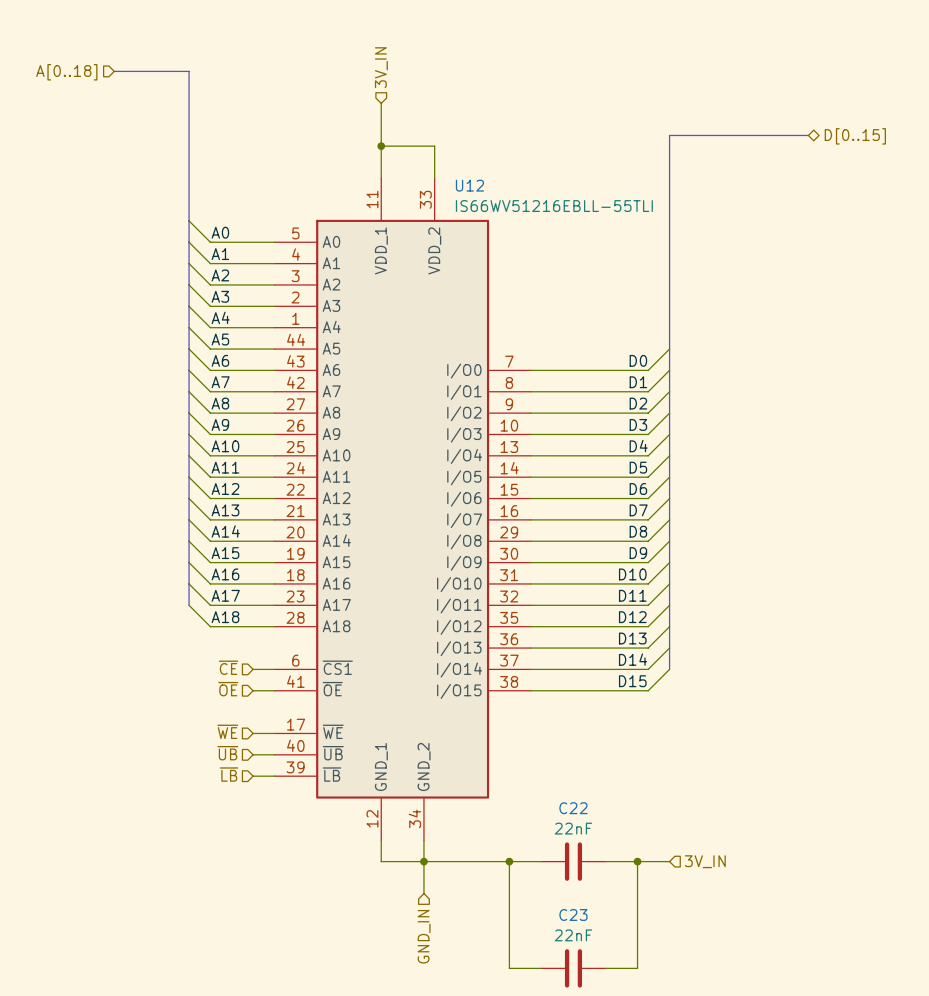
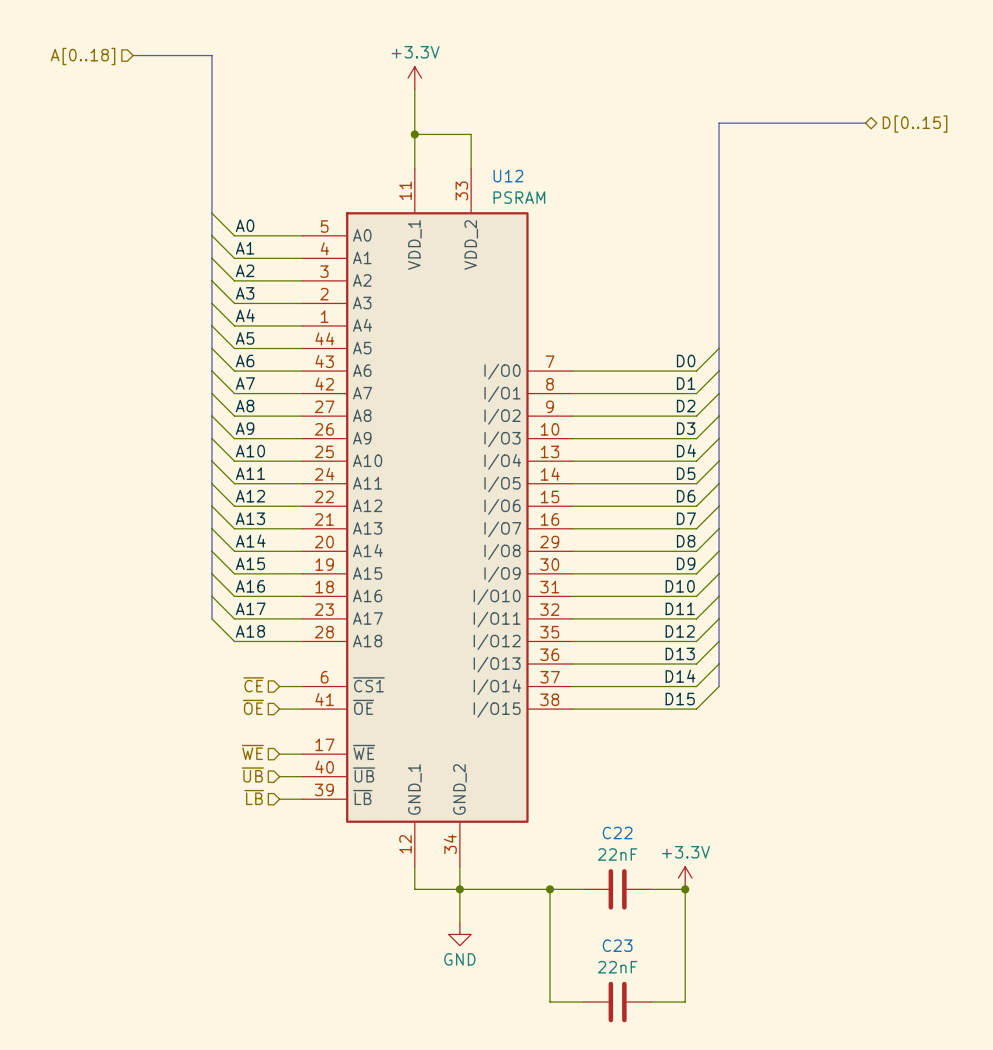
hierarchical label: 3V_IN (381, 67) -> none
power symbol: none -> +3.3V (414, 78)
U12 value: IS66WV51216EBLL-55TLI (554, 206) -> PSRAM (519, 197)
power symbol: none -> +3.3V (685, 878)
wire: (637, 861) (669, 861) -> none
hierarchical label: 3V_IN (705, 861) -> none
power symbol: none -> GND (459, 934)
hierarchical label: GND_IN (424, 936) -> none

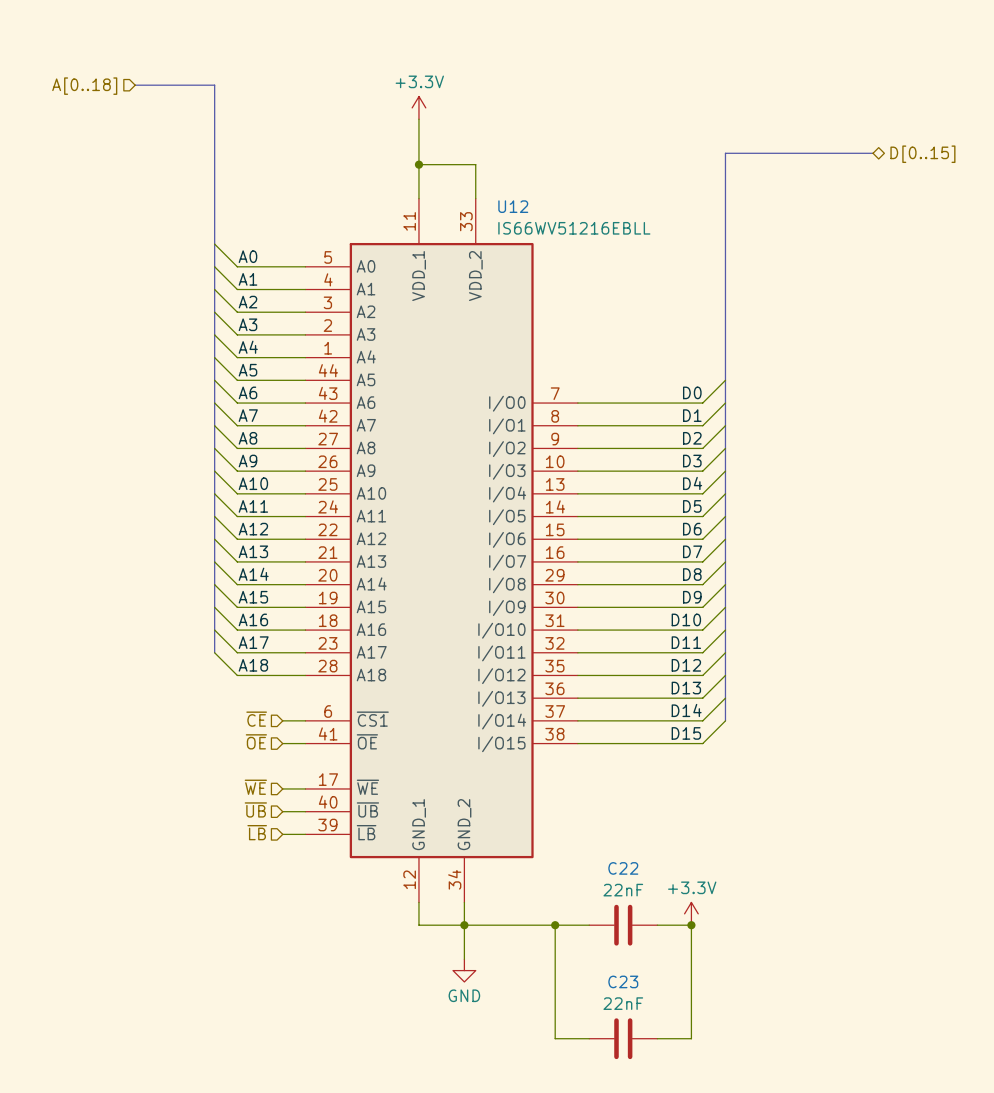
U12 value: PSRAM (519, 197) -> IS66WV51216EBLL (574, 228)

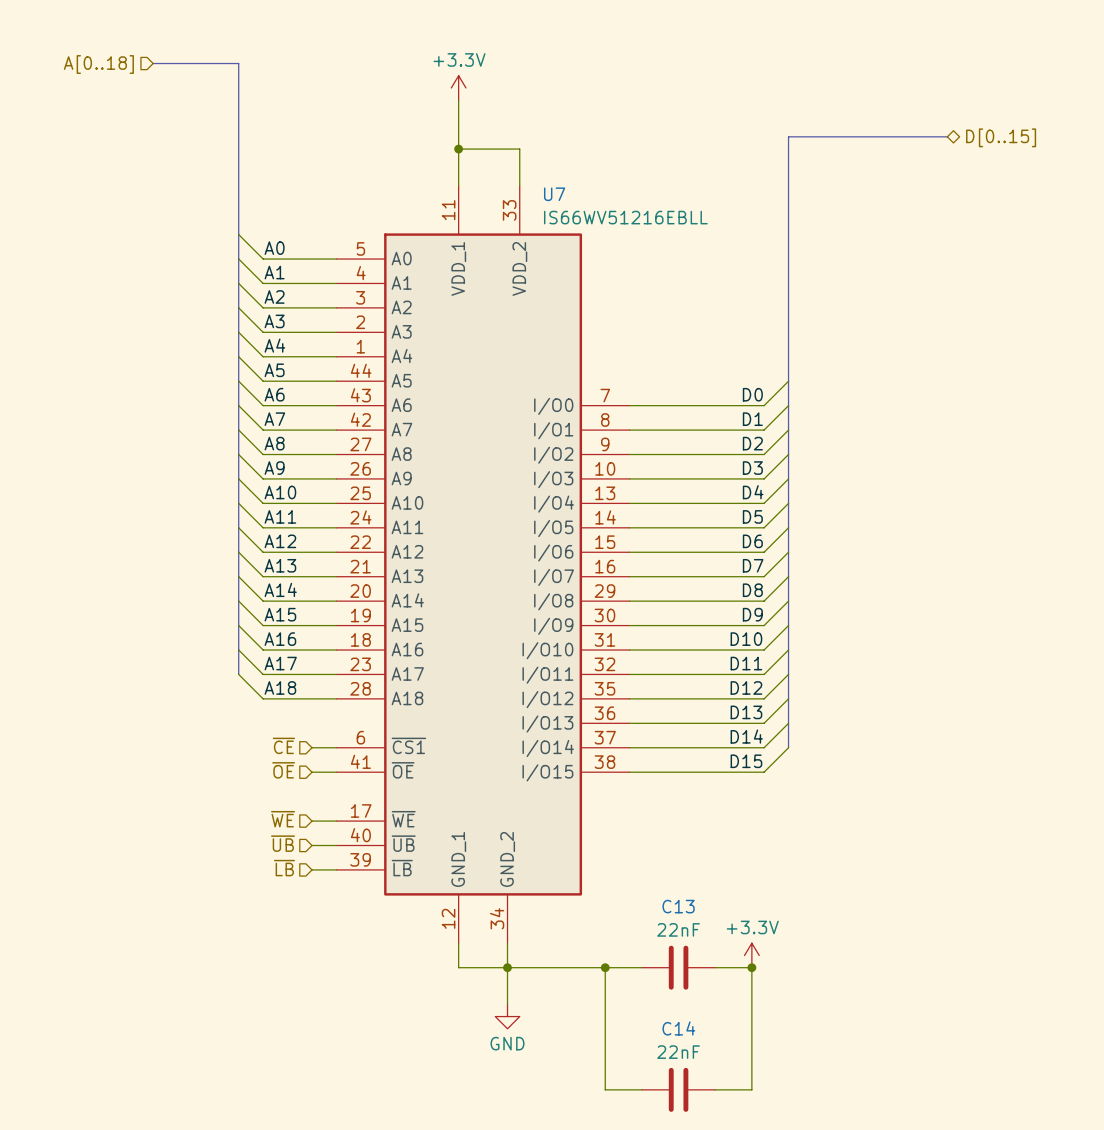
U12 name: U12 (513, 206) -> U7 (554, 194)
C22 name: C22 (623, 868) -> C13 (678, 906)
C23 name: C23 (623, 981) -> C14 (678, 1028)

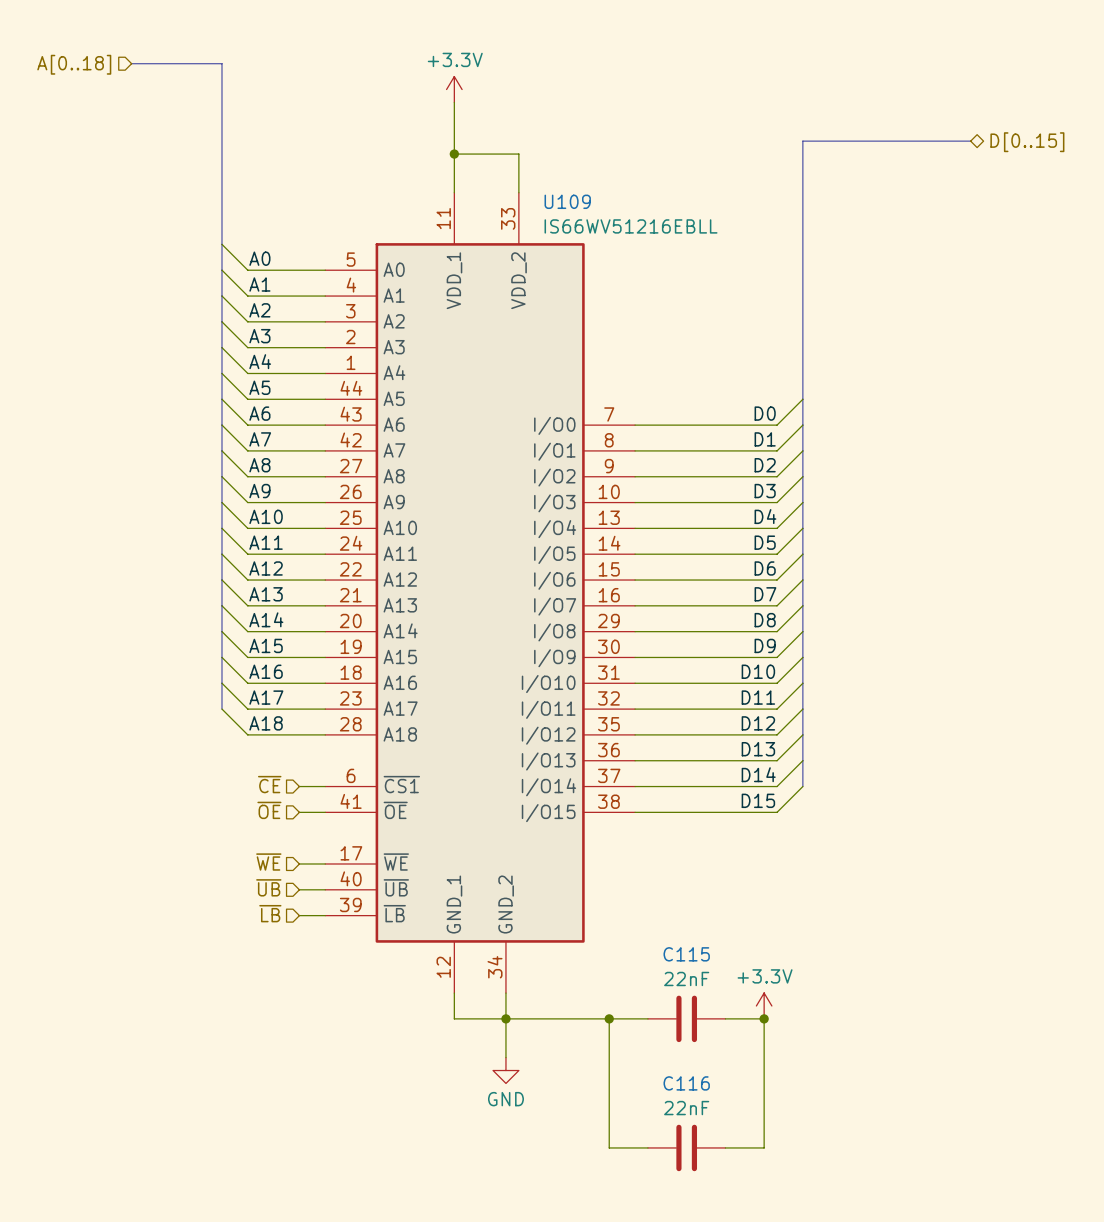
U7 name: U7 (554, 194) -> U109 (567, 201)
C13 name: C13 (678, 906) -> C115 (686, 954)
C14 name: C14 (678, 1028) -> C116 (686, 1083)

